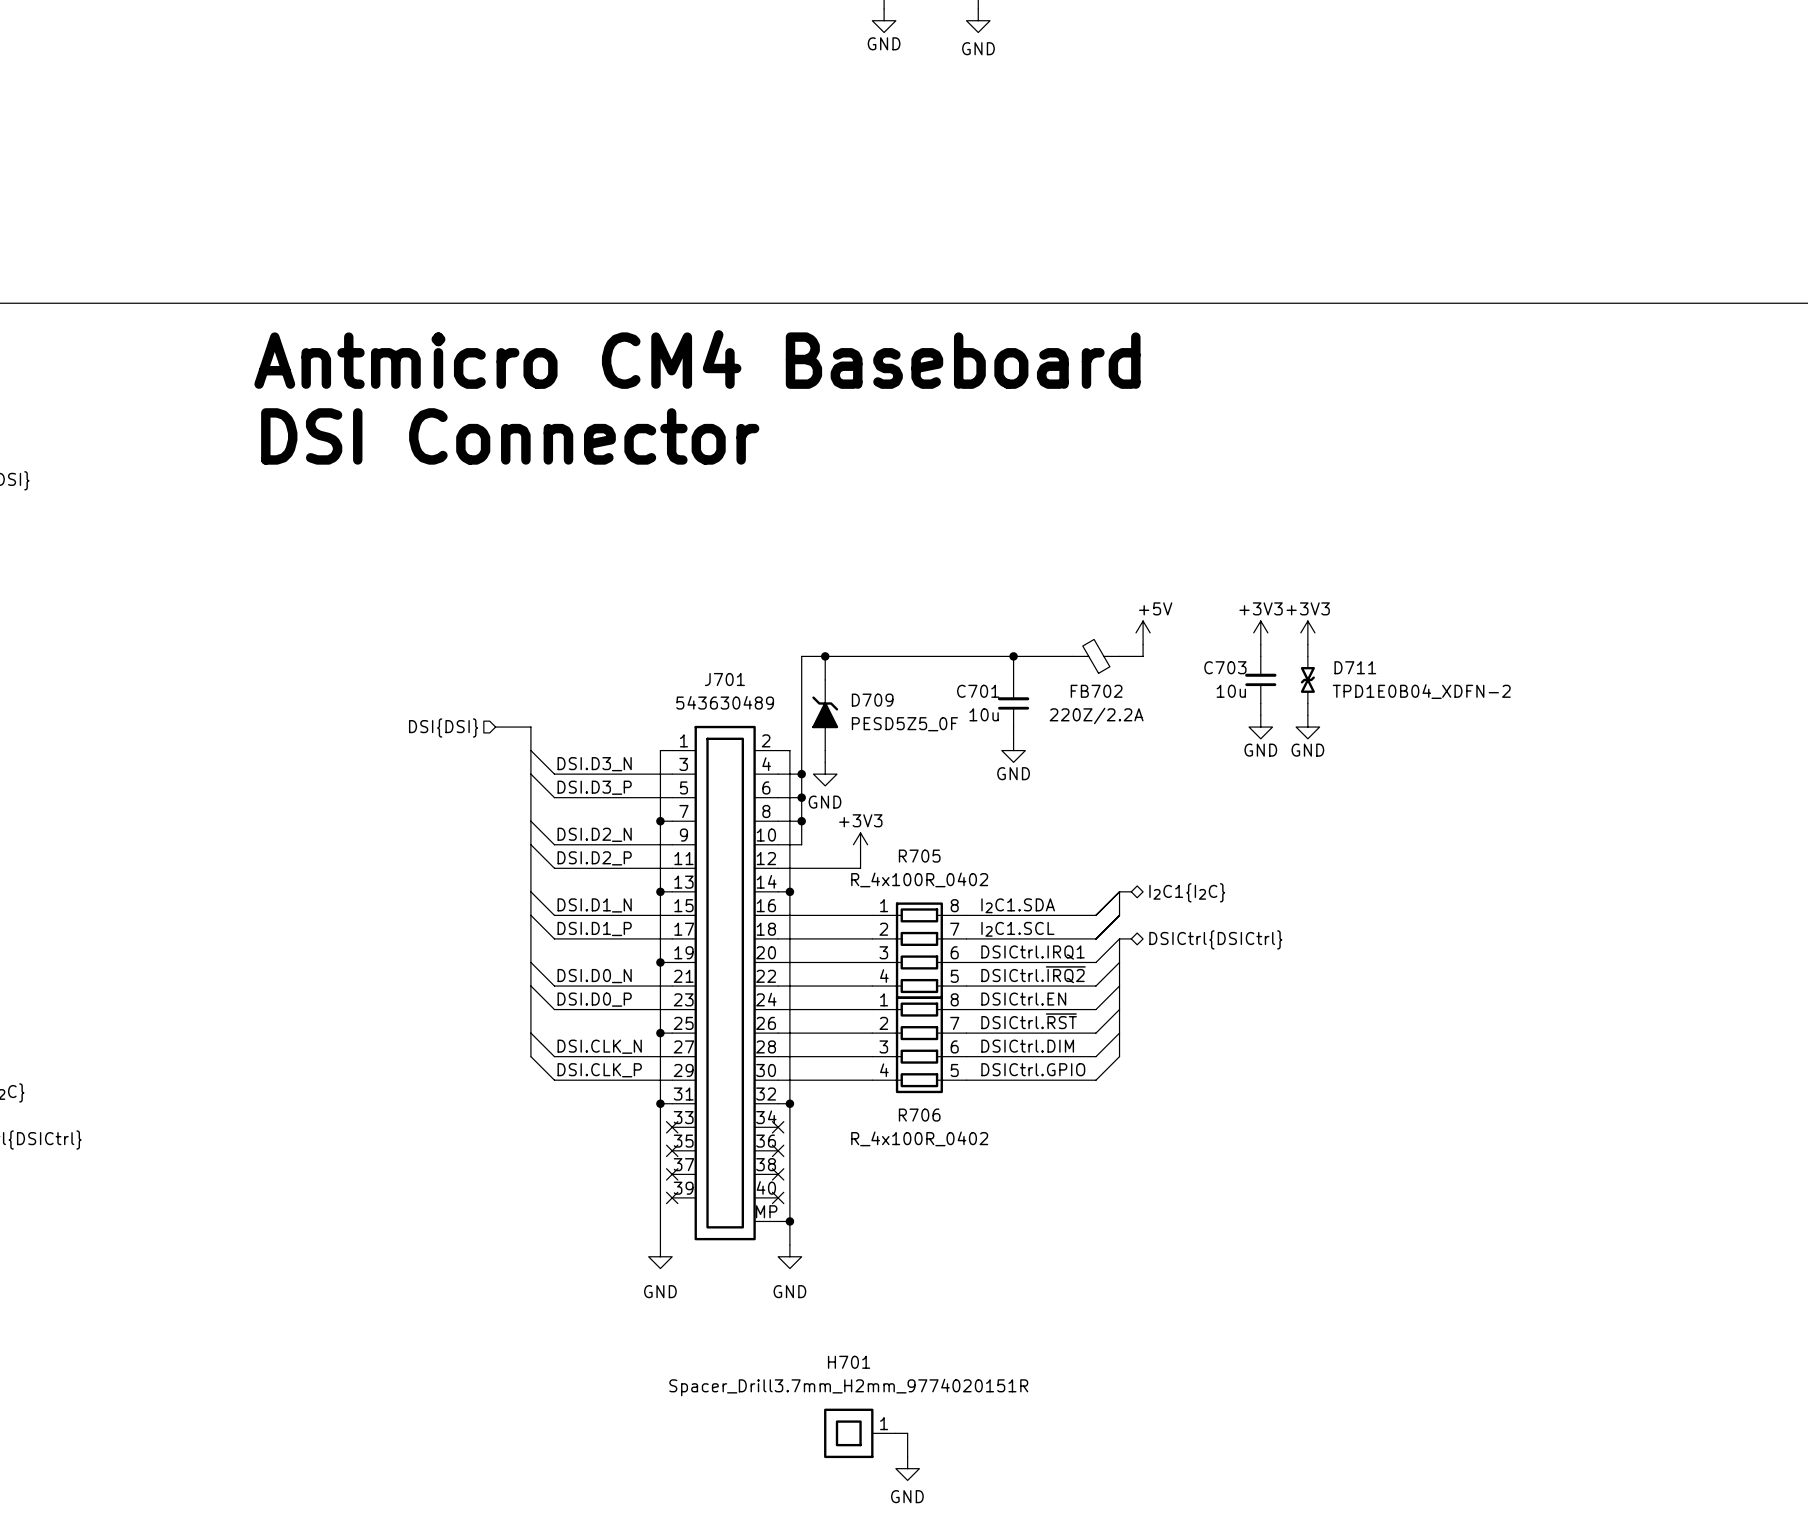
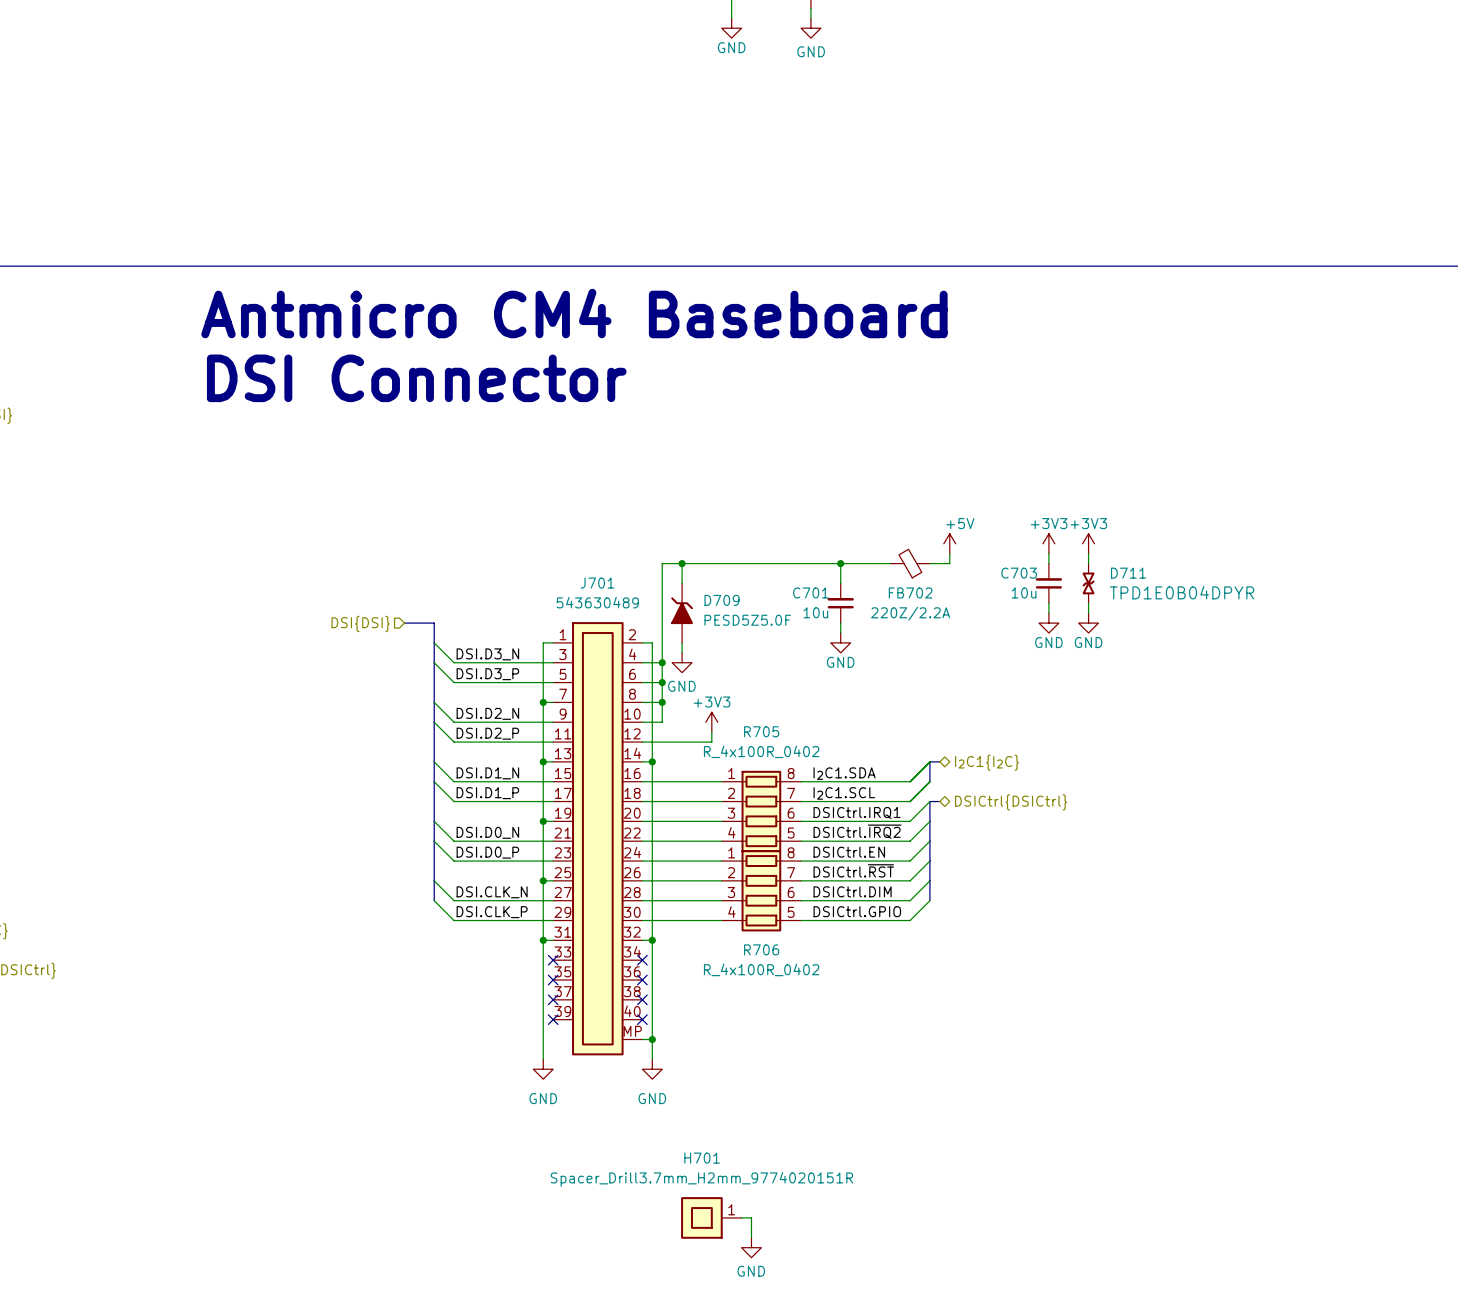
D711 text: none -> TPD1E0B04DPYR (1181, 592)
D711 value: TPD1E0B04_XDFN-2 (1421, 691) -> none
D709 text: none -> PESD5Z5.0F (747, 620)
D709 value: PESD5Z5_0F (904, 724) -> none

